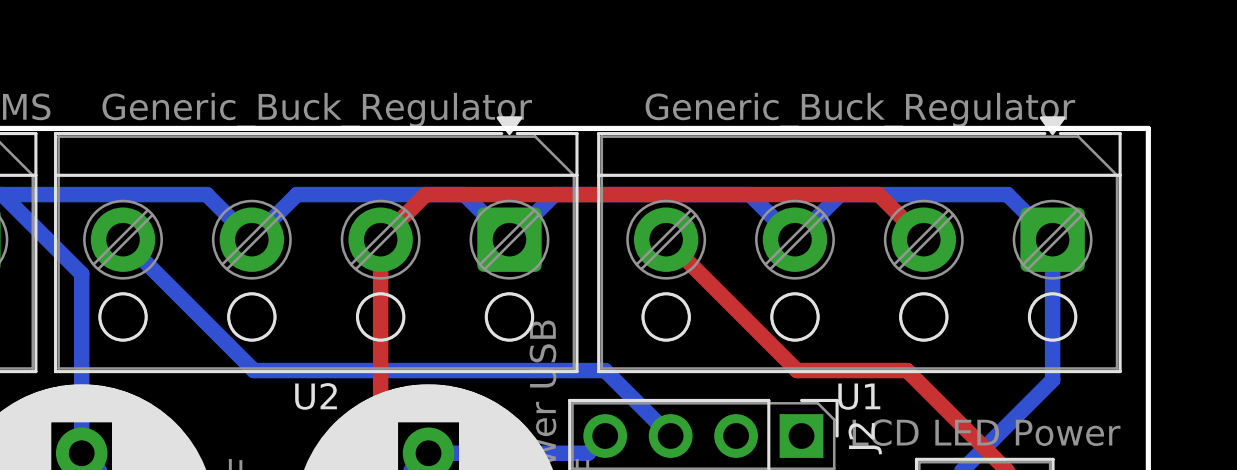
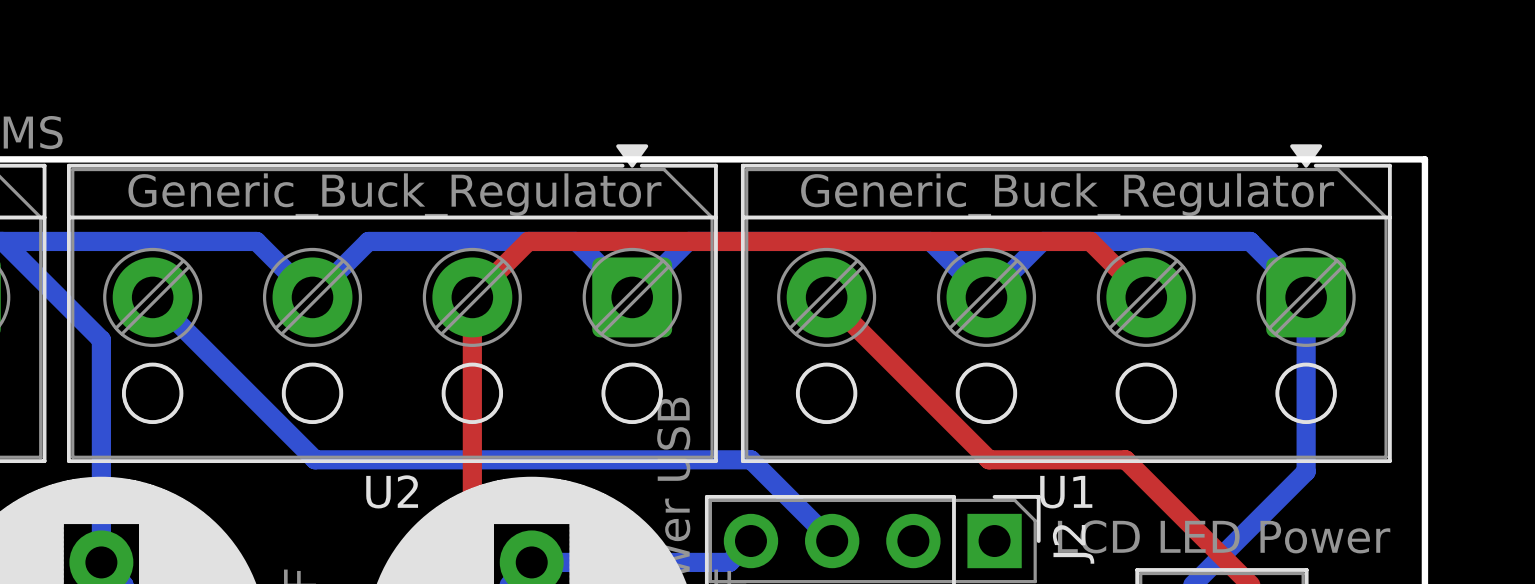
U2 value position: Generic_Buck_Regulator (317, 110) -> Generic_Buck_Regulator (394, 195)
U1 value position: Generic_Buck_Regulator (860, 110) -> Generic_Buck_Regulator (1067, 195)

